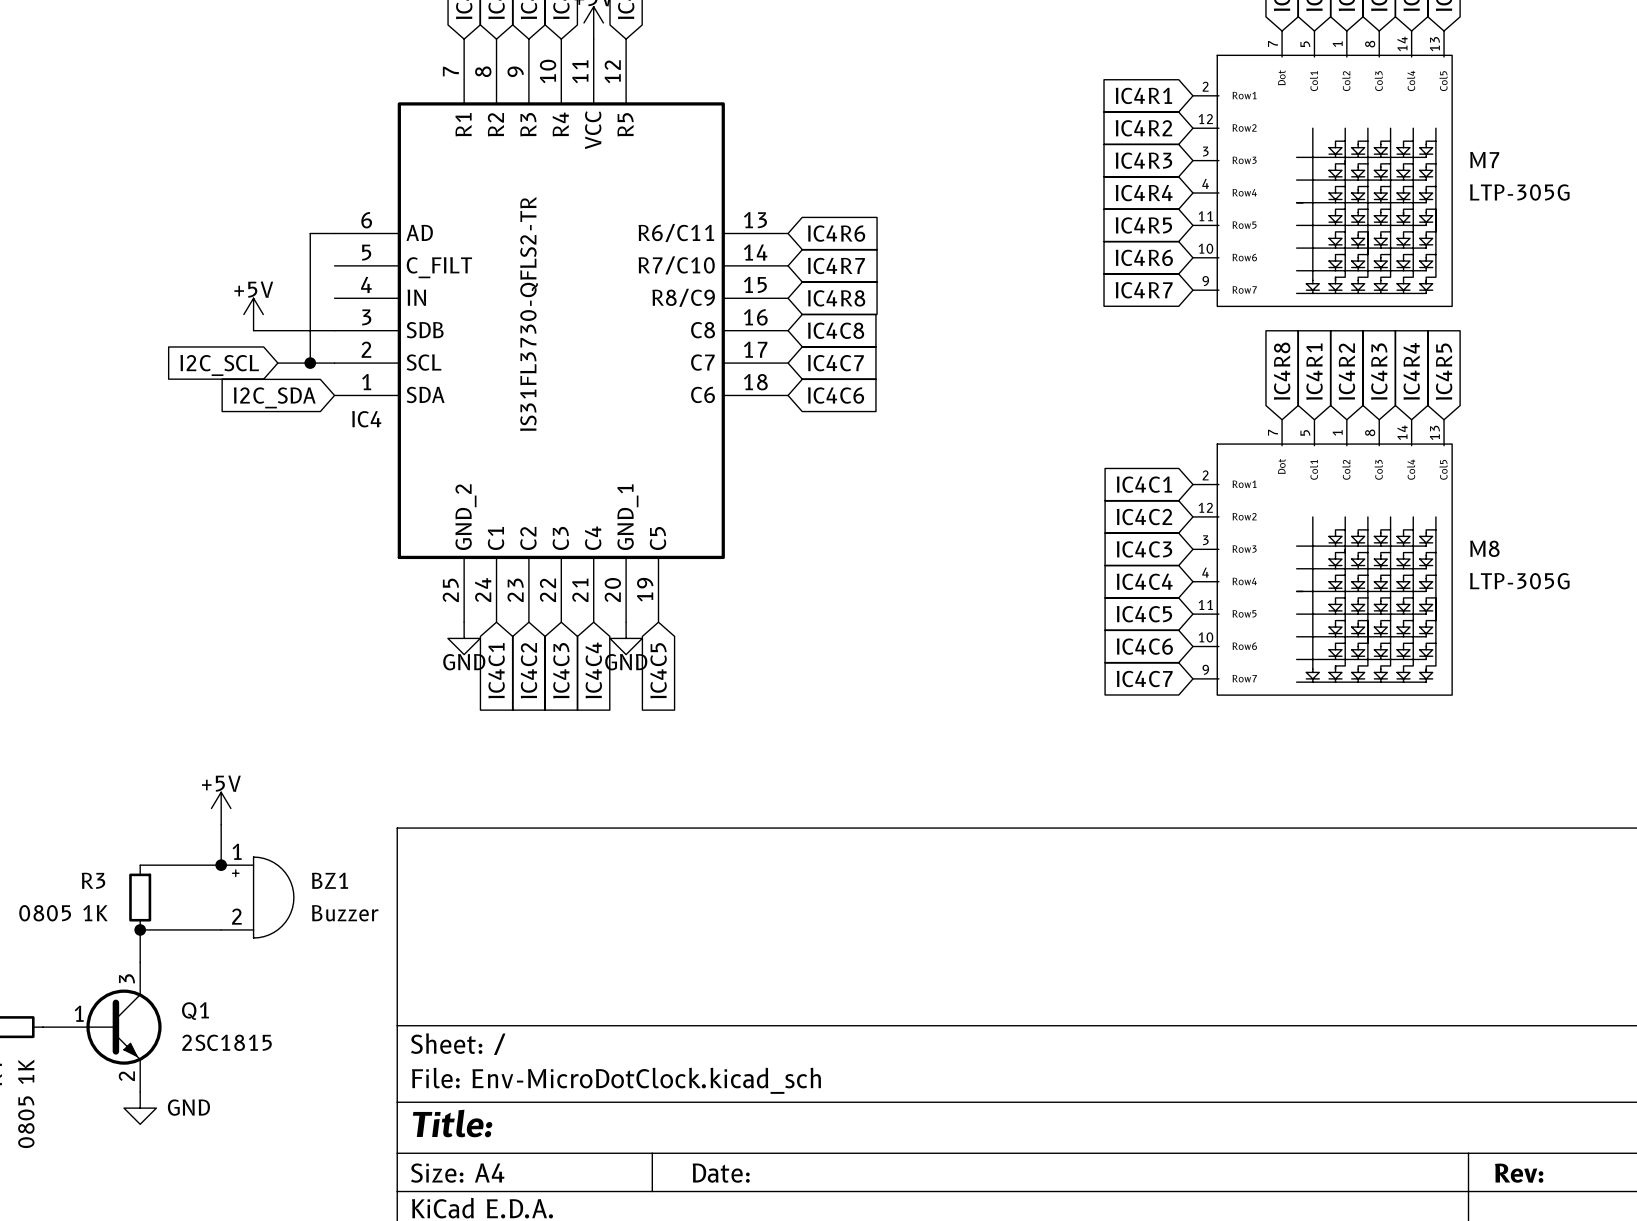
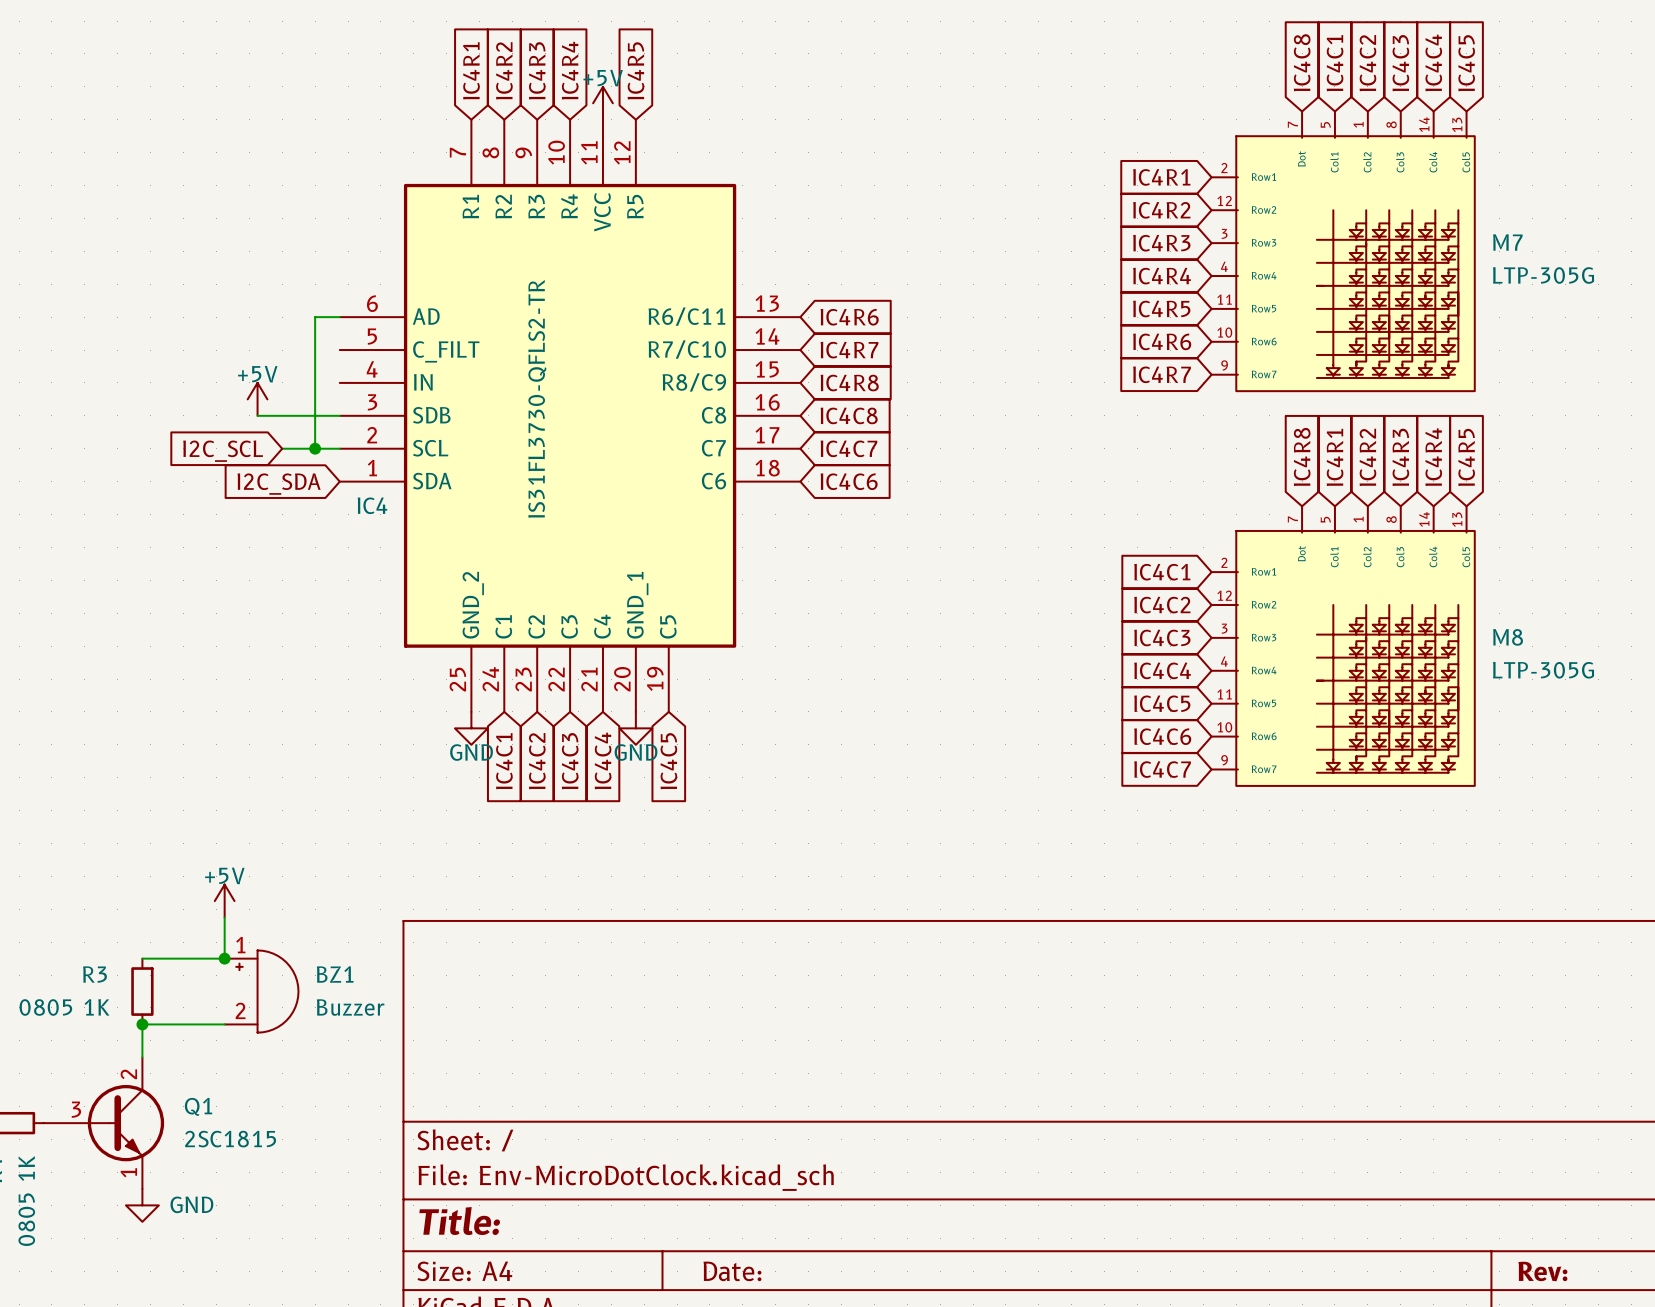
Q1 symbol: [43, 962, 162, 1092] -> [43, 1057, 165, 1189]

